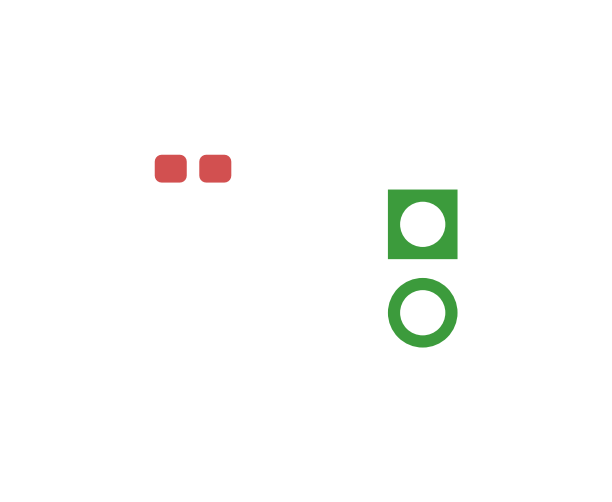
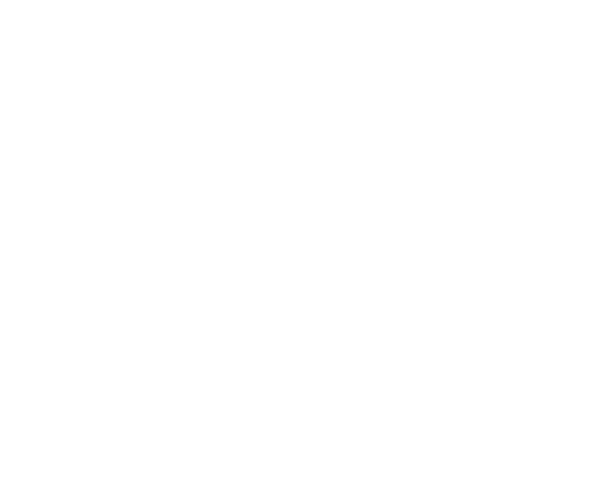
part: (193, 168) -> none
part: (422, 268) -> none

